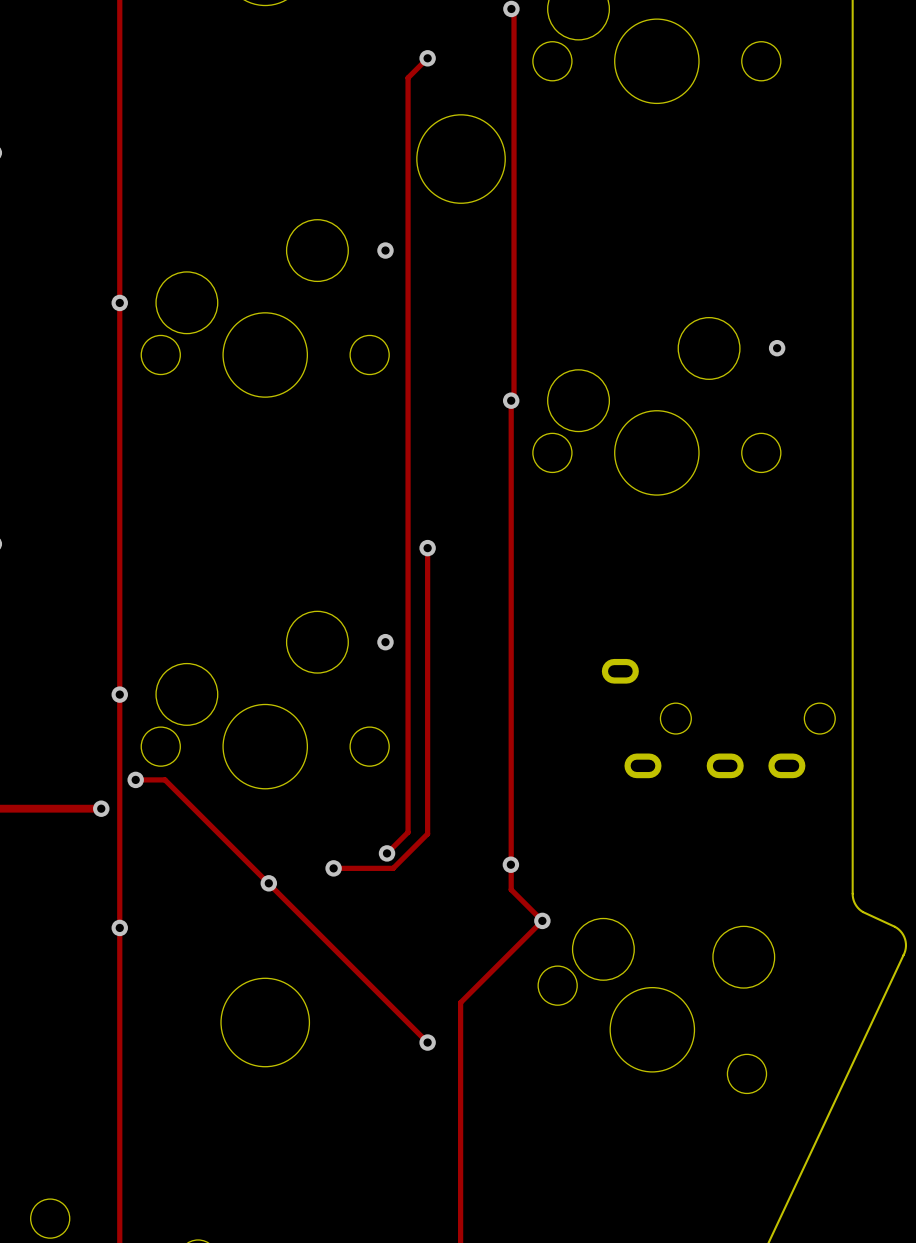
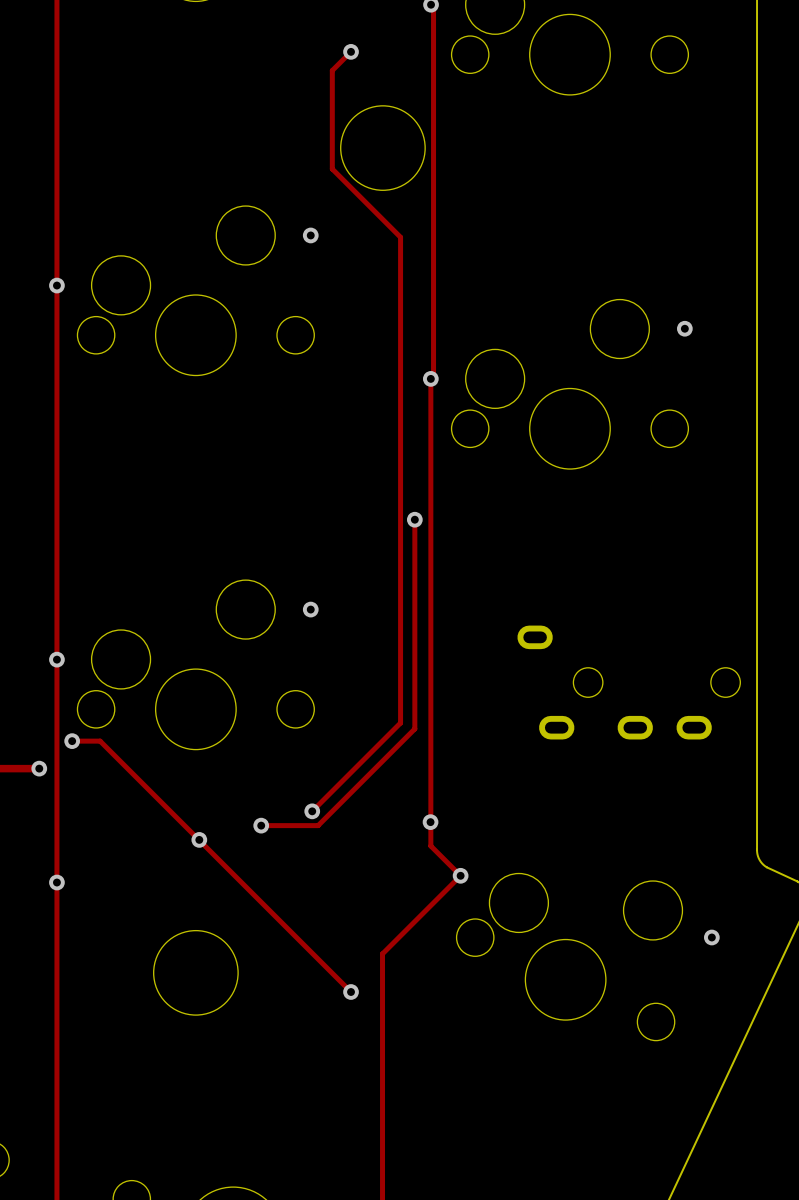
track: (408, 180) (408, 832) -> (332, 169) (400, 237) (400, 723) (332, 791)
track: (427, 548) (427, 833) -> (414, 519) (414, 728) (351, 792)
via position: (427, 548) -> (414, 519)
via: none -> (711, 937)

